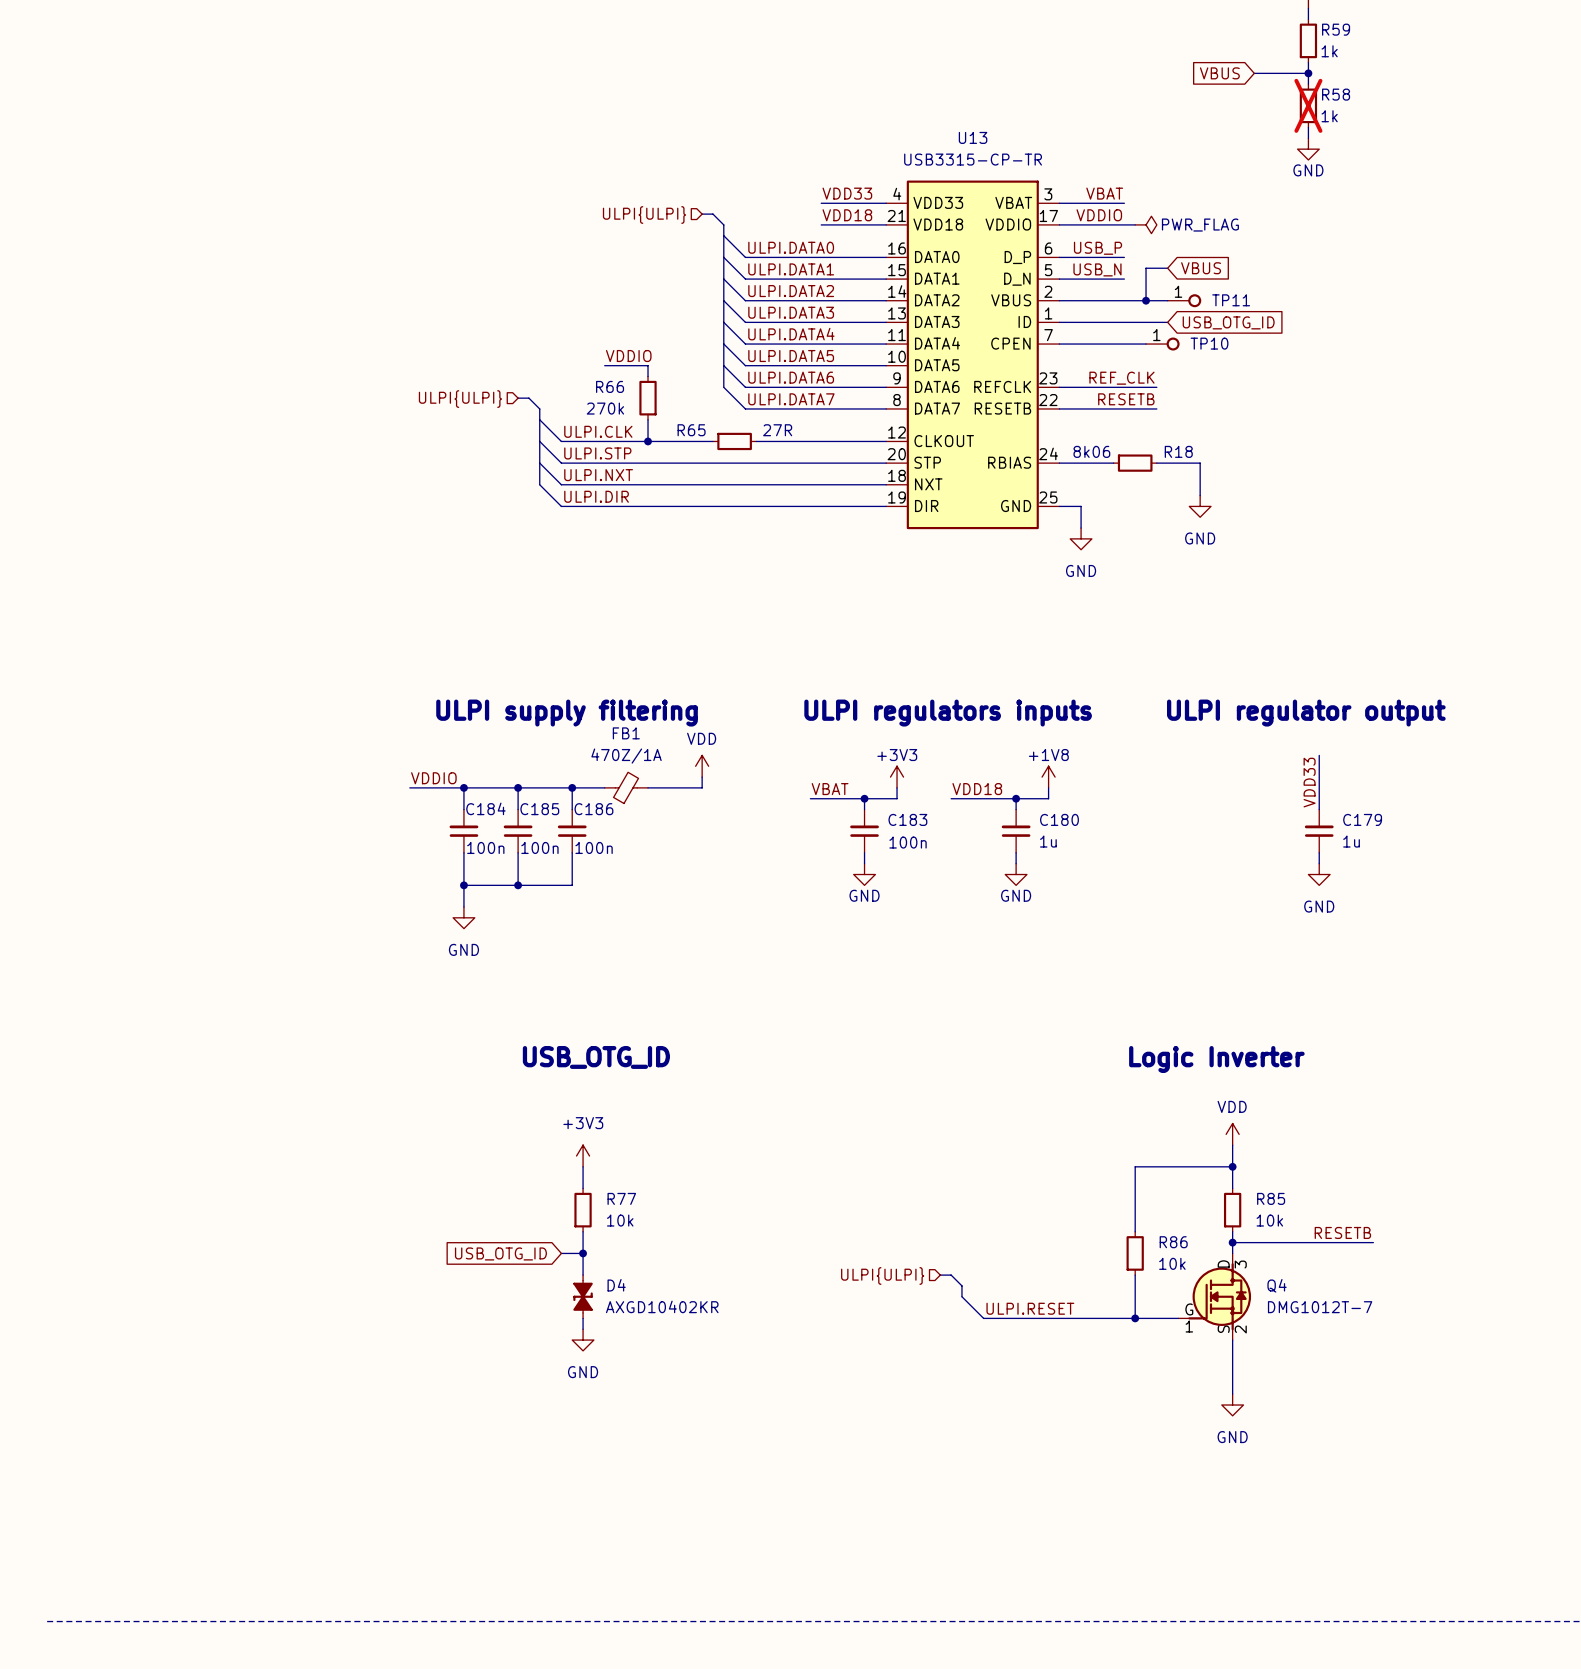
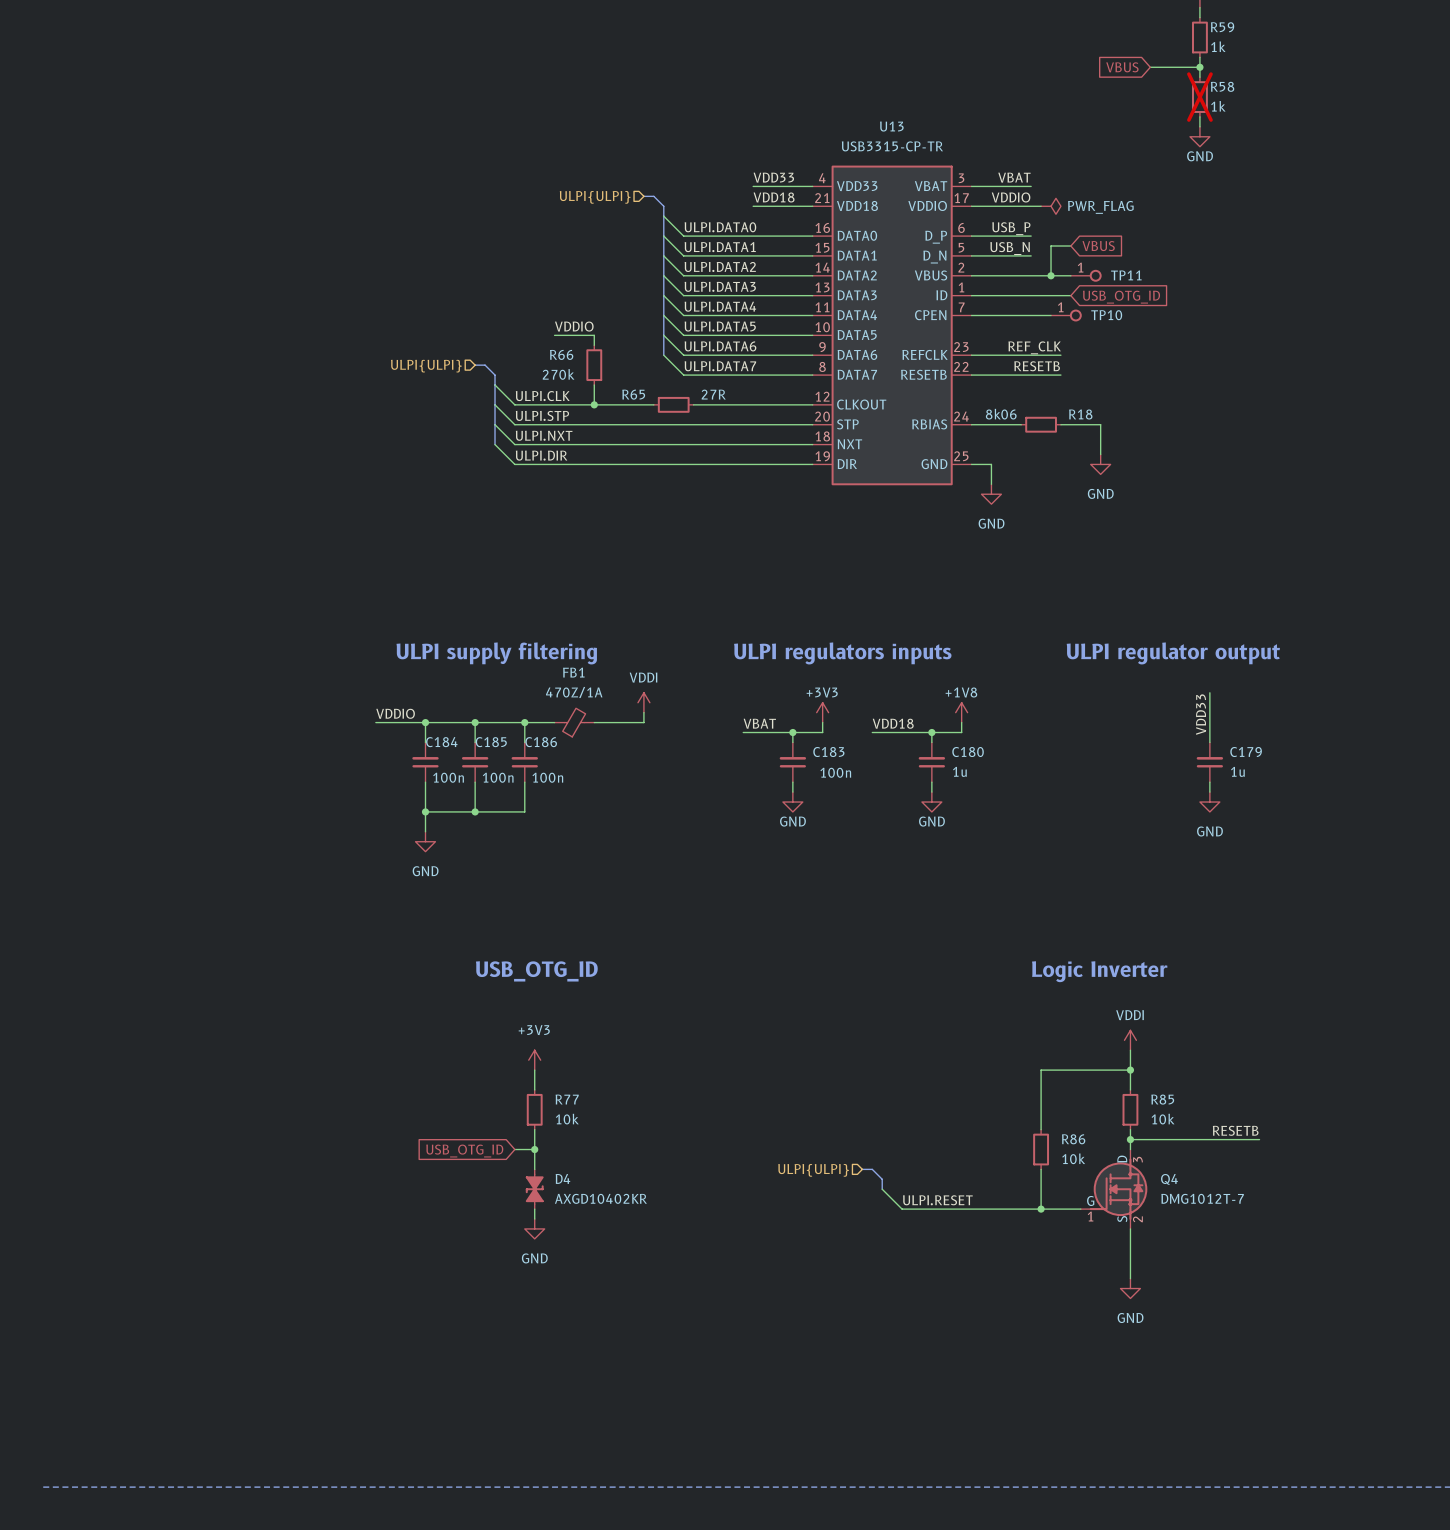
power symbol: VDD (702, 766) -> VDDI (643, 702)
power symbol: VDD (1232, 1134) -> VDDI (1130, 1040)

